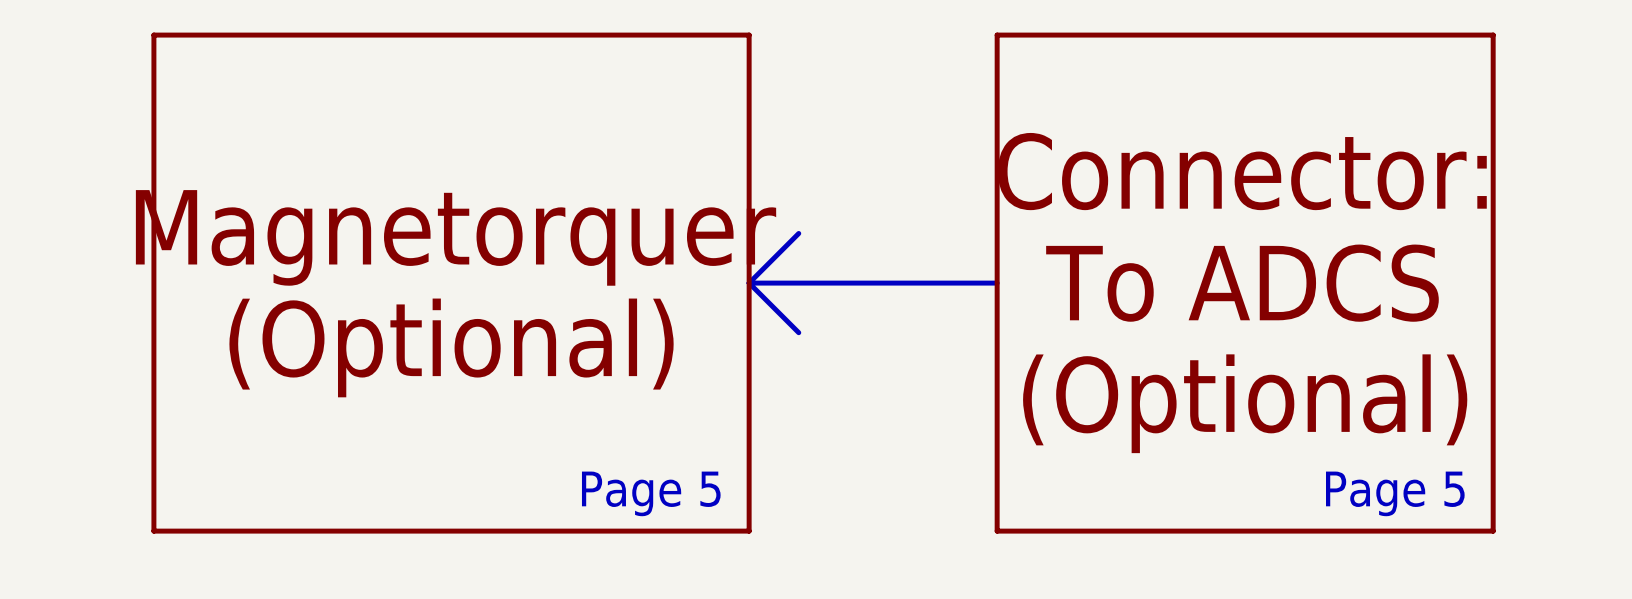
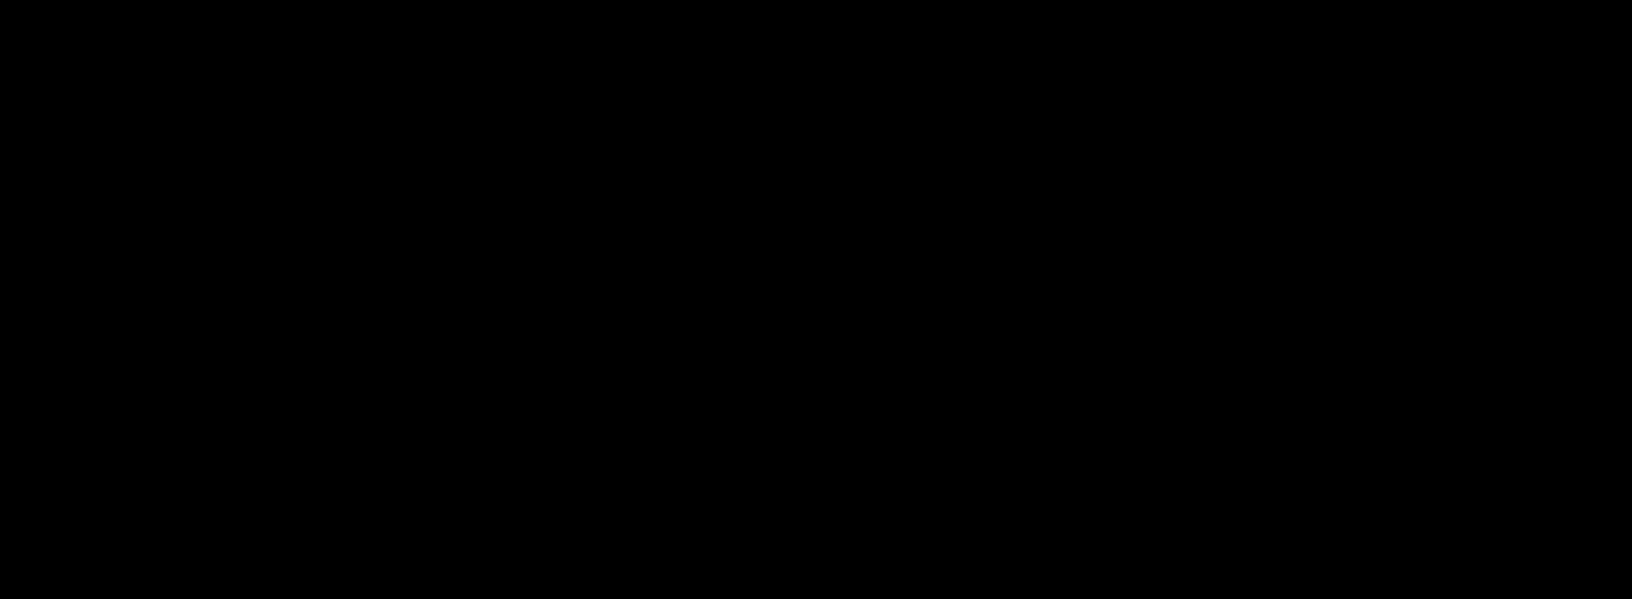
line: (153, 35) (749, 35) (749, 531) (153, 531) (153, 35) -> none
line: (997, 35) (997, 531) (1493, 531) (1493, 35) (997, 35) -> none
text: Connector: (1242, 171) -> none
line: (798, 233) (749, 283) -> none
text: Magnetorquer (456, 237) -> none
line: (749, 283) (997, 283) -> none
line: (749, 283) (798, 332) -> none
text: To ADCS (1242, 283) -> none
text: (Optional) (451, 347) -> none
text: (Optional) (1245, 403) -> none
text: Page 5 (651, 493) -> none
text: Page 5 (1395, 493) -> none

